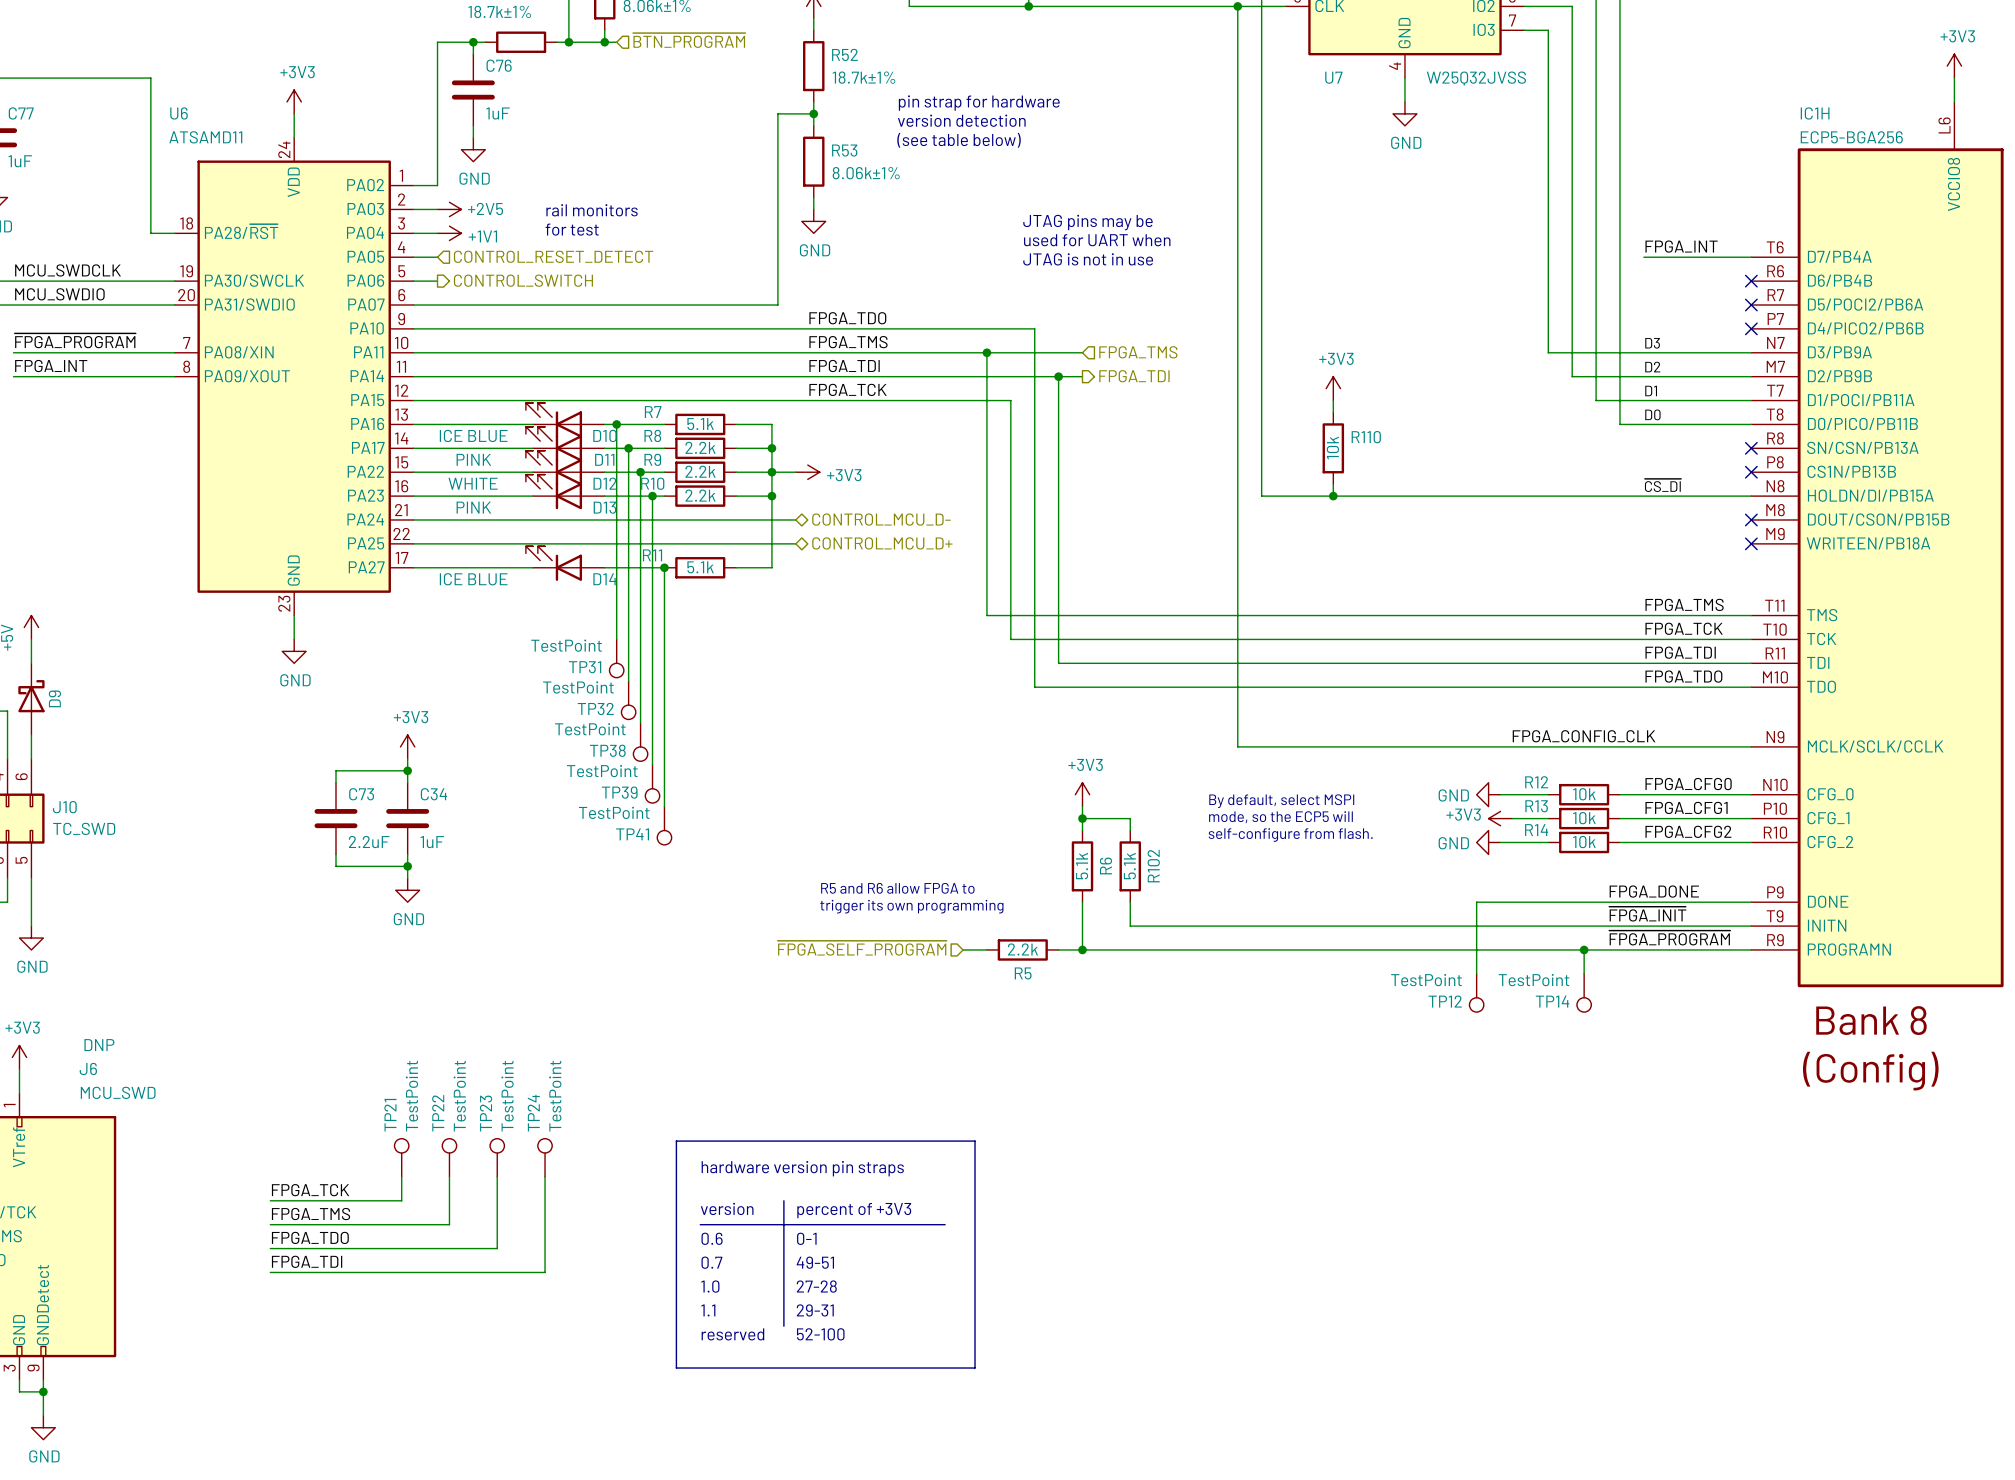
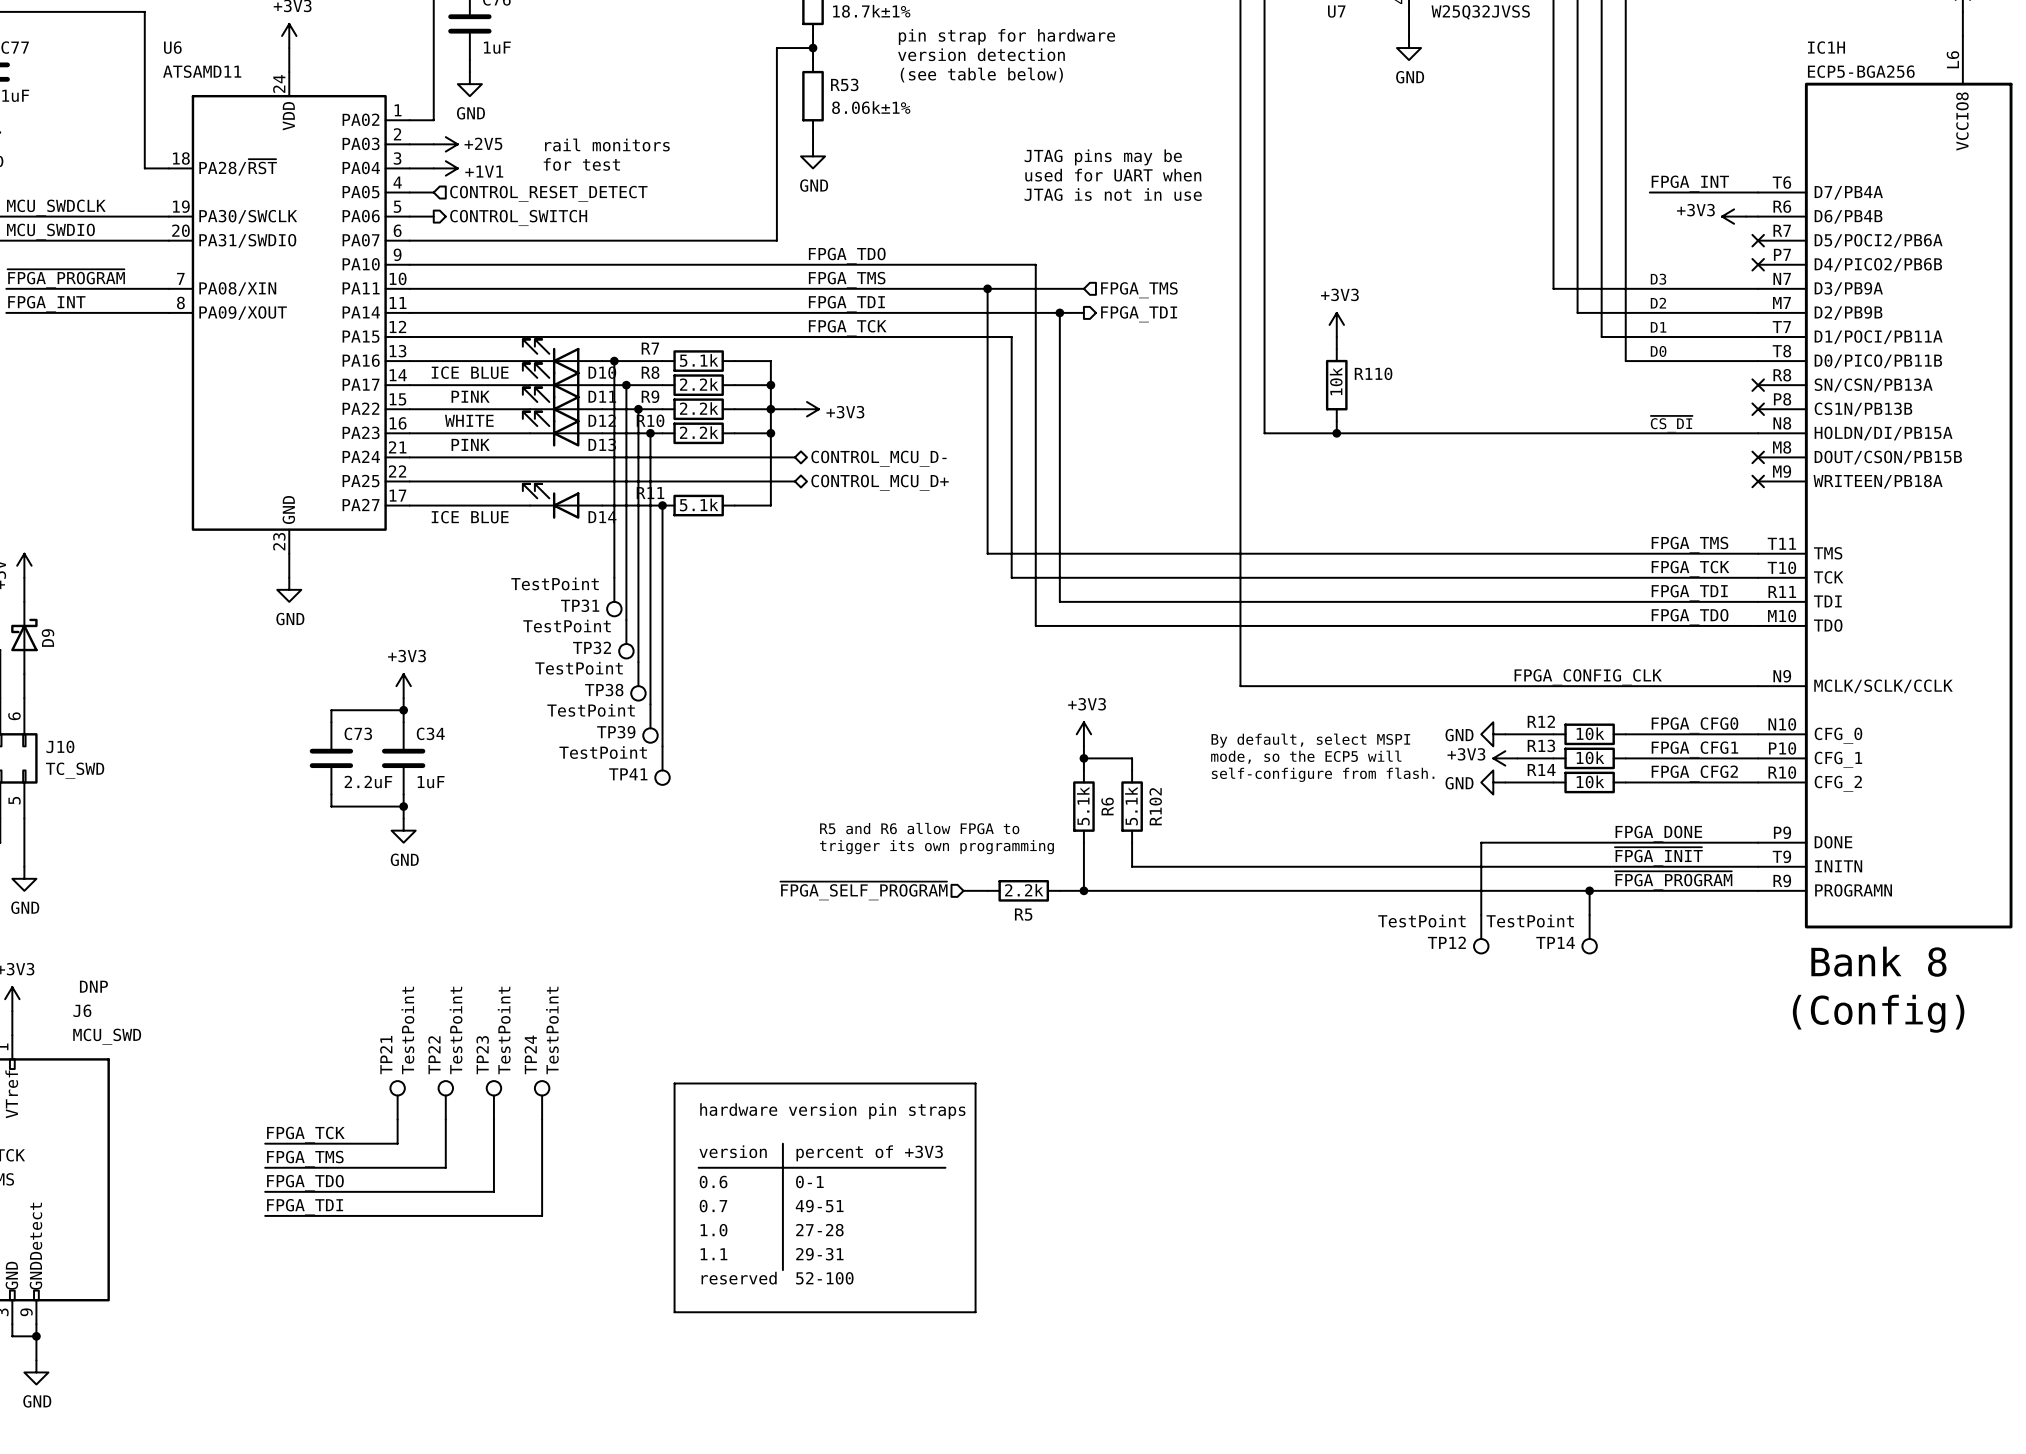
power symbol: none -> +3V3 (1734, 216)
wire: none -> (1746, 216) (1758, 216)
no-connect mark: (1751, 281) -> none

